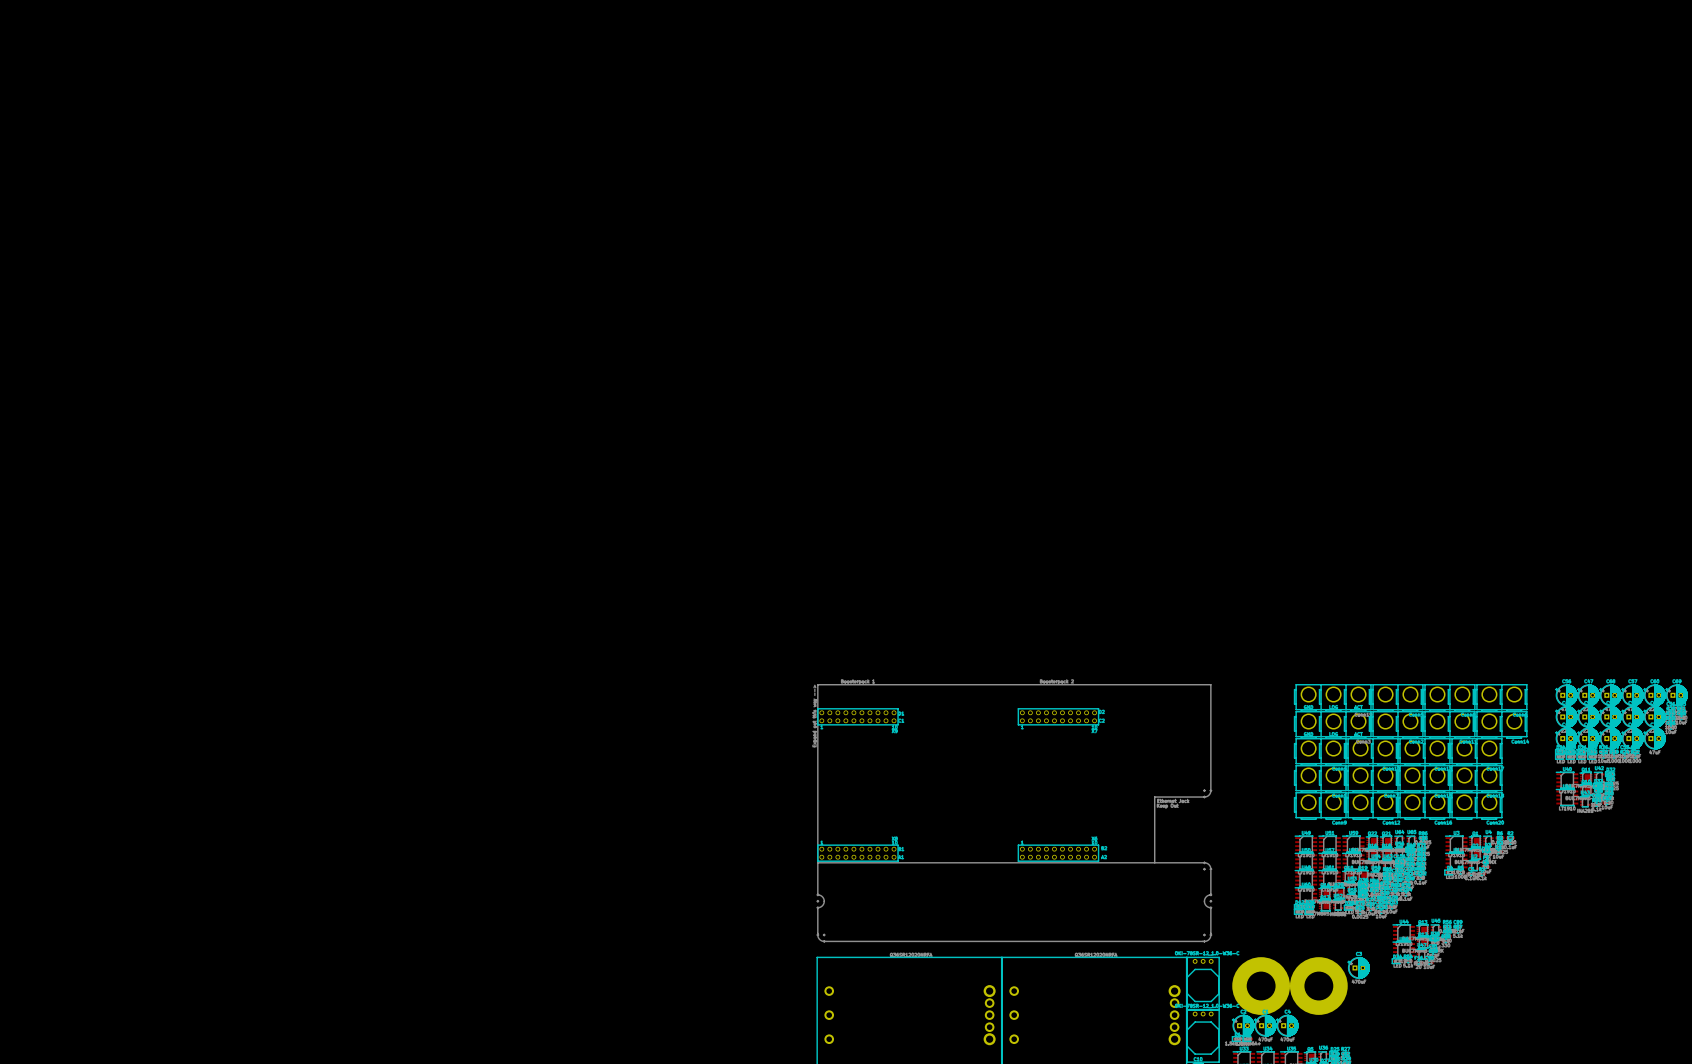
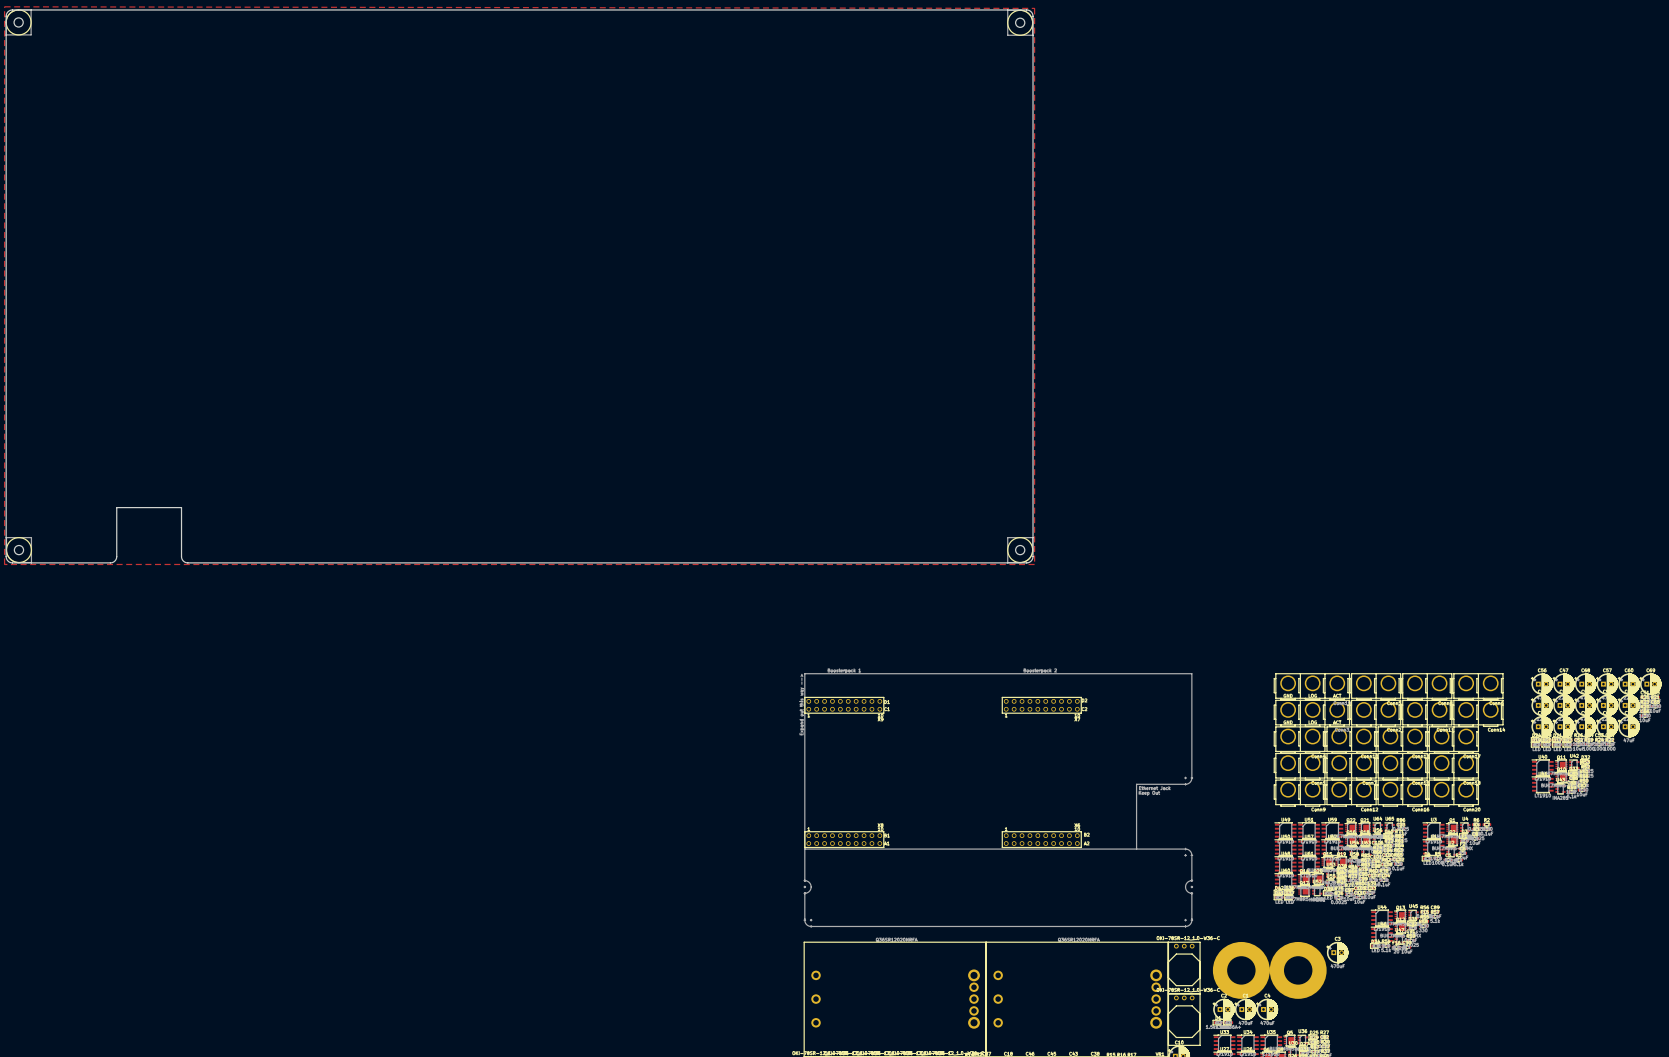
zone outline: none -> (4, 6) (4, 564) (1034, 564) (1034, 8) (4, 6)
board edge: none -> (12, 9) (1029, 10) (1033, 16) (1032, 559) (1026, 562) (187, 562) (183, 561) (181, 557) (181, 507) (116, 507) (116, 556) (113, 562) (9, 562) (6, 556) (6, 16) (8, 11) (12, 9)
part: none -> (18, 22)
part: none -> (1020, 22)
part: none -> (18, 550)
part: none -> (1020, 550)

